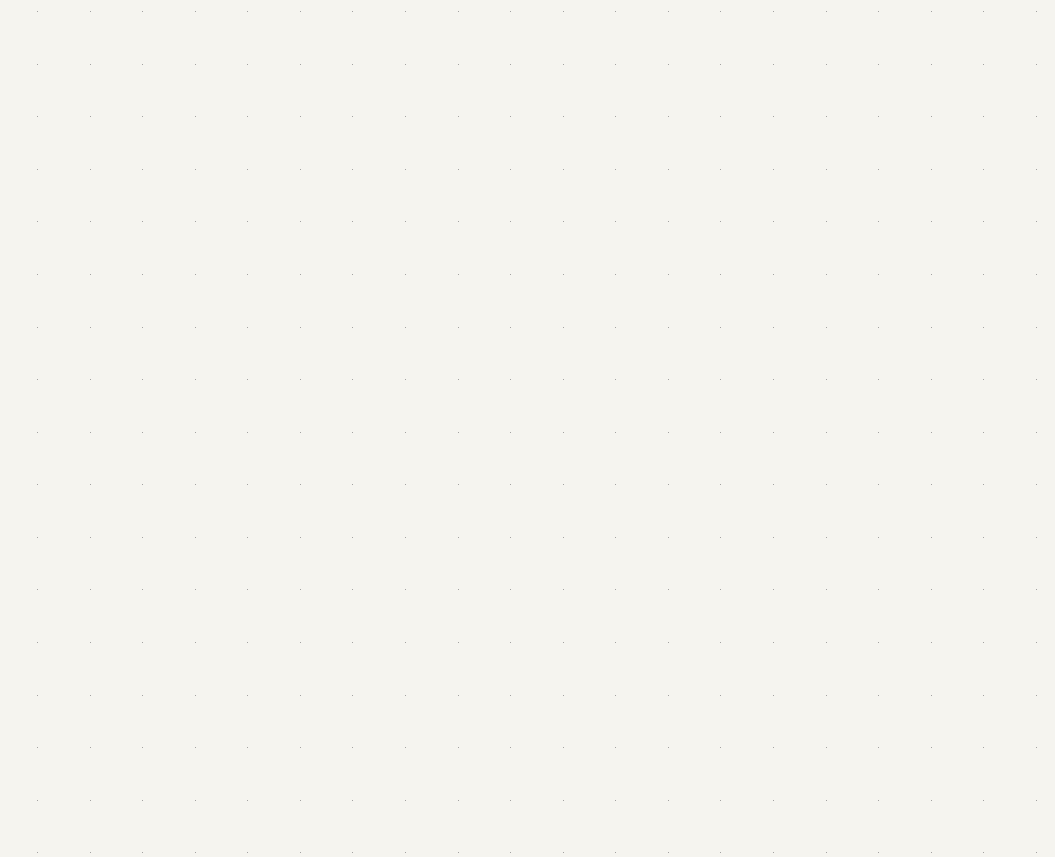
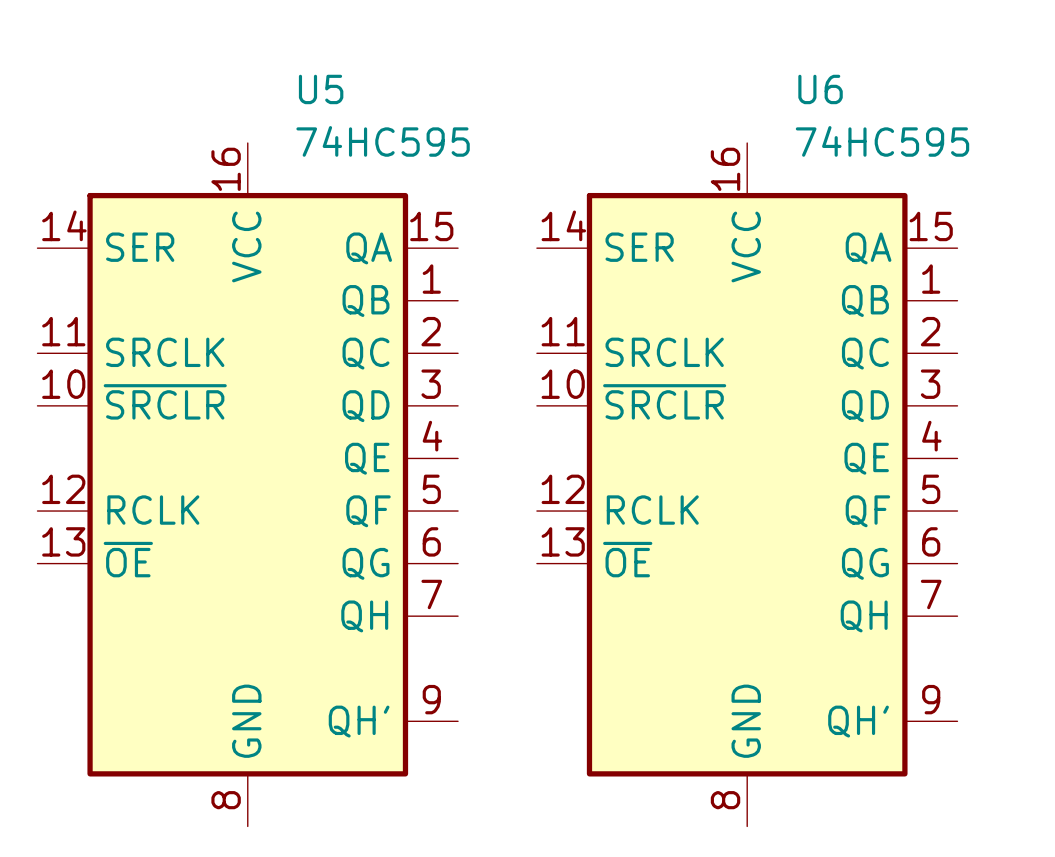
U5: none -> 74HC595 (247, 484)
U6: none -> 74HC595 (747, 484)

